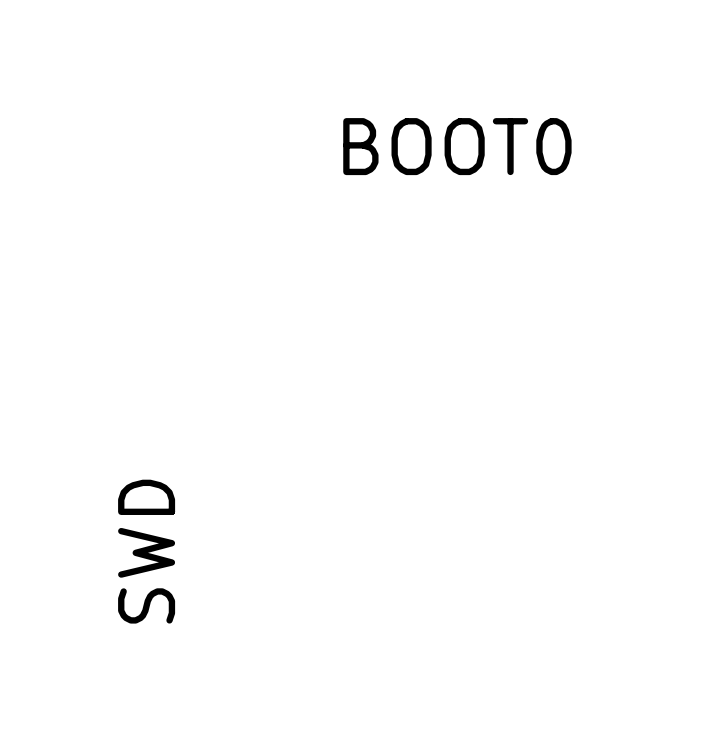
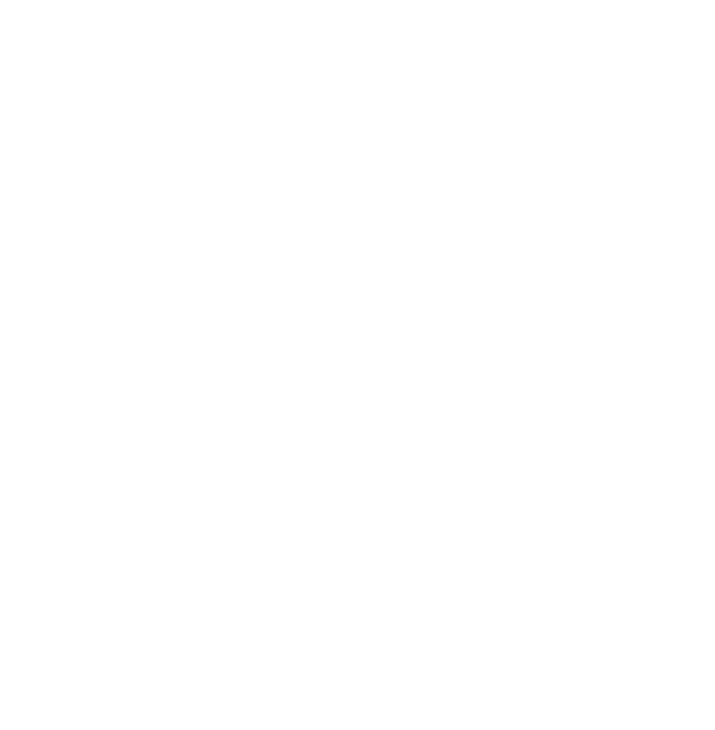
text: BOOT0 (457, 146) -> none
text: SWD (146, 551) -> none

